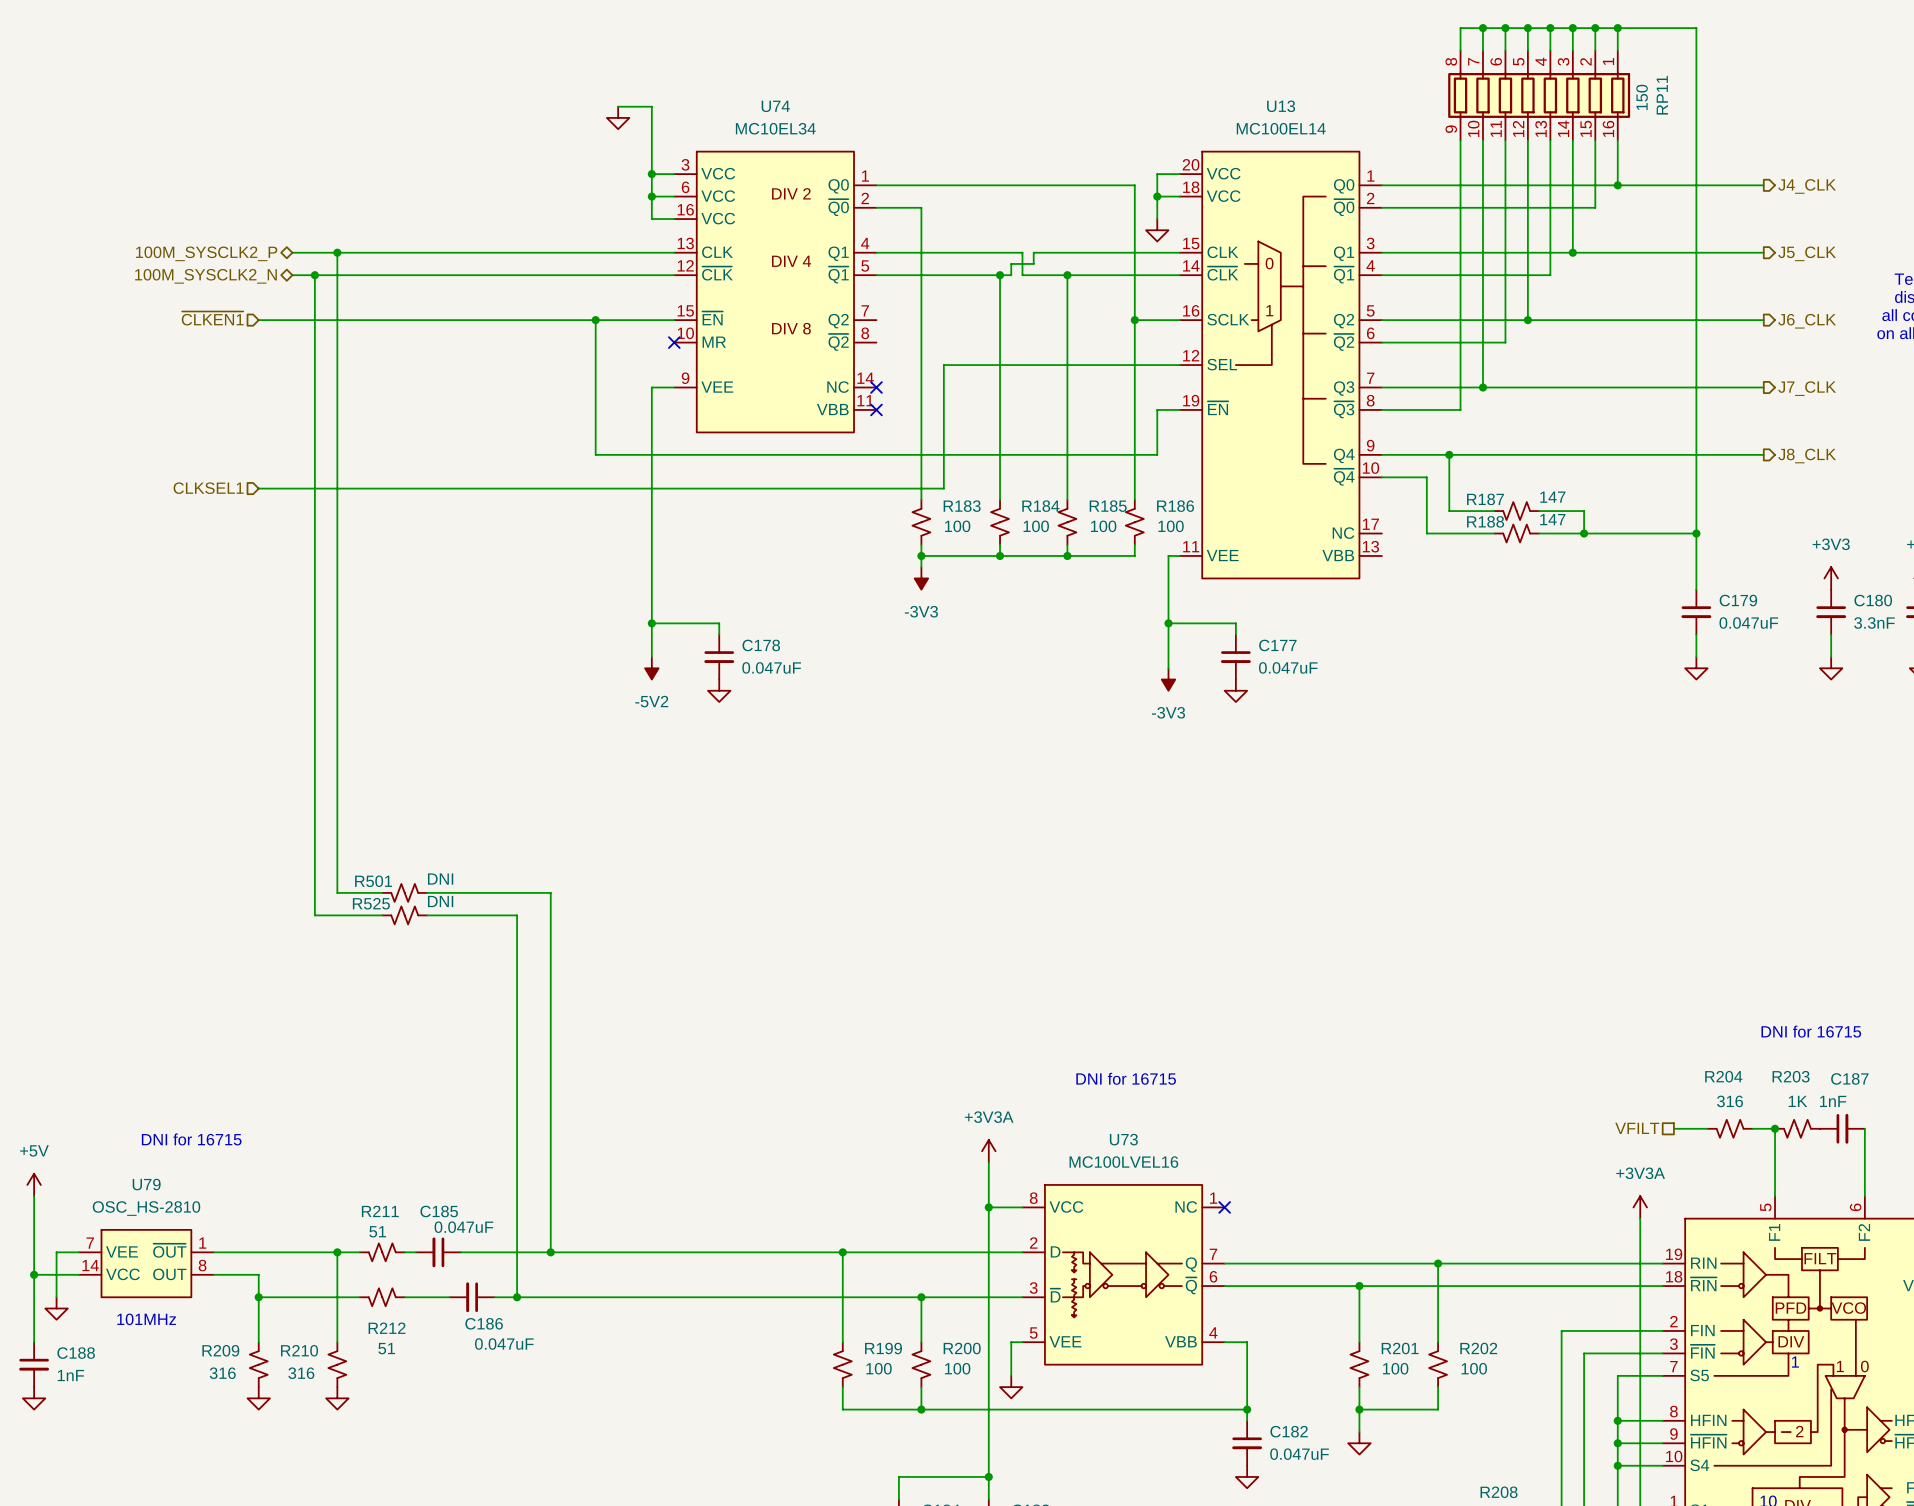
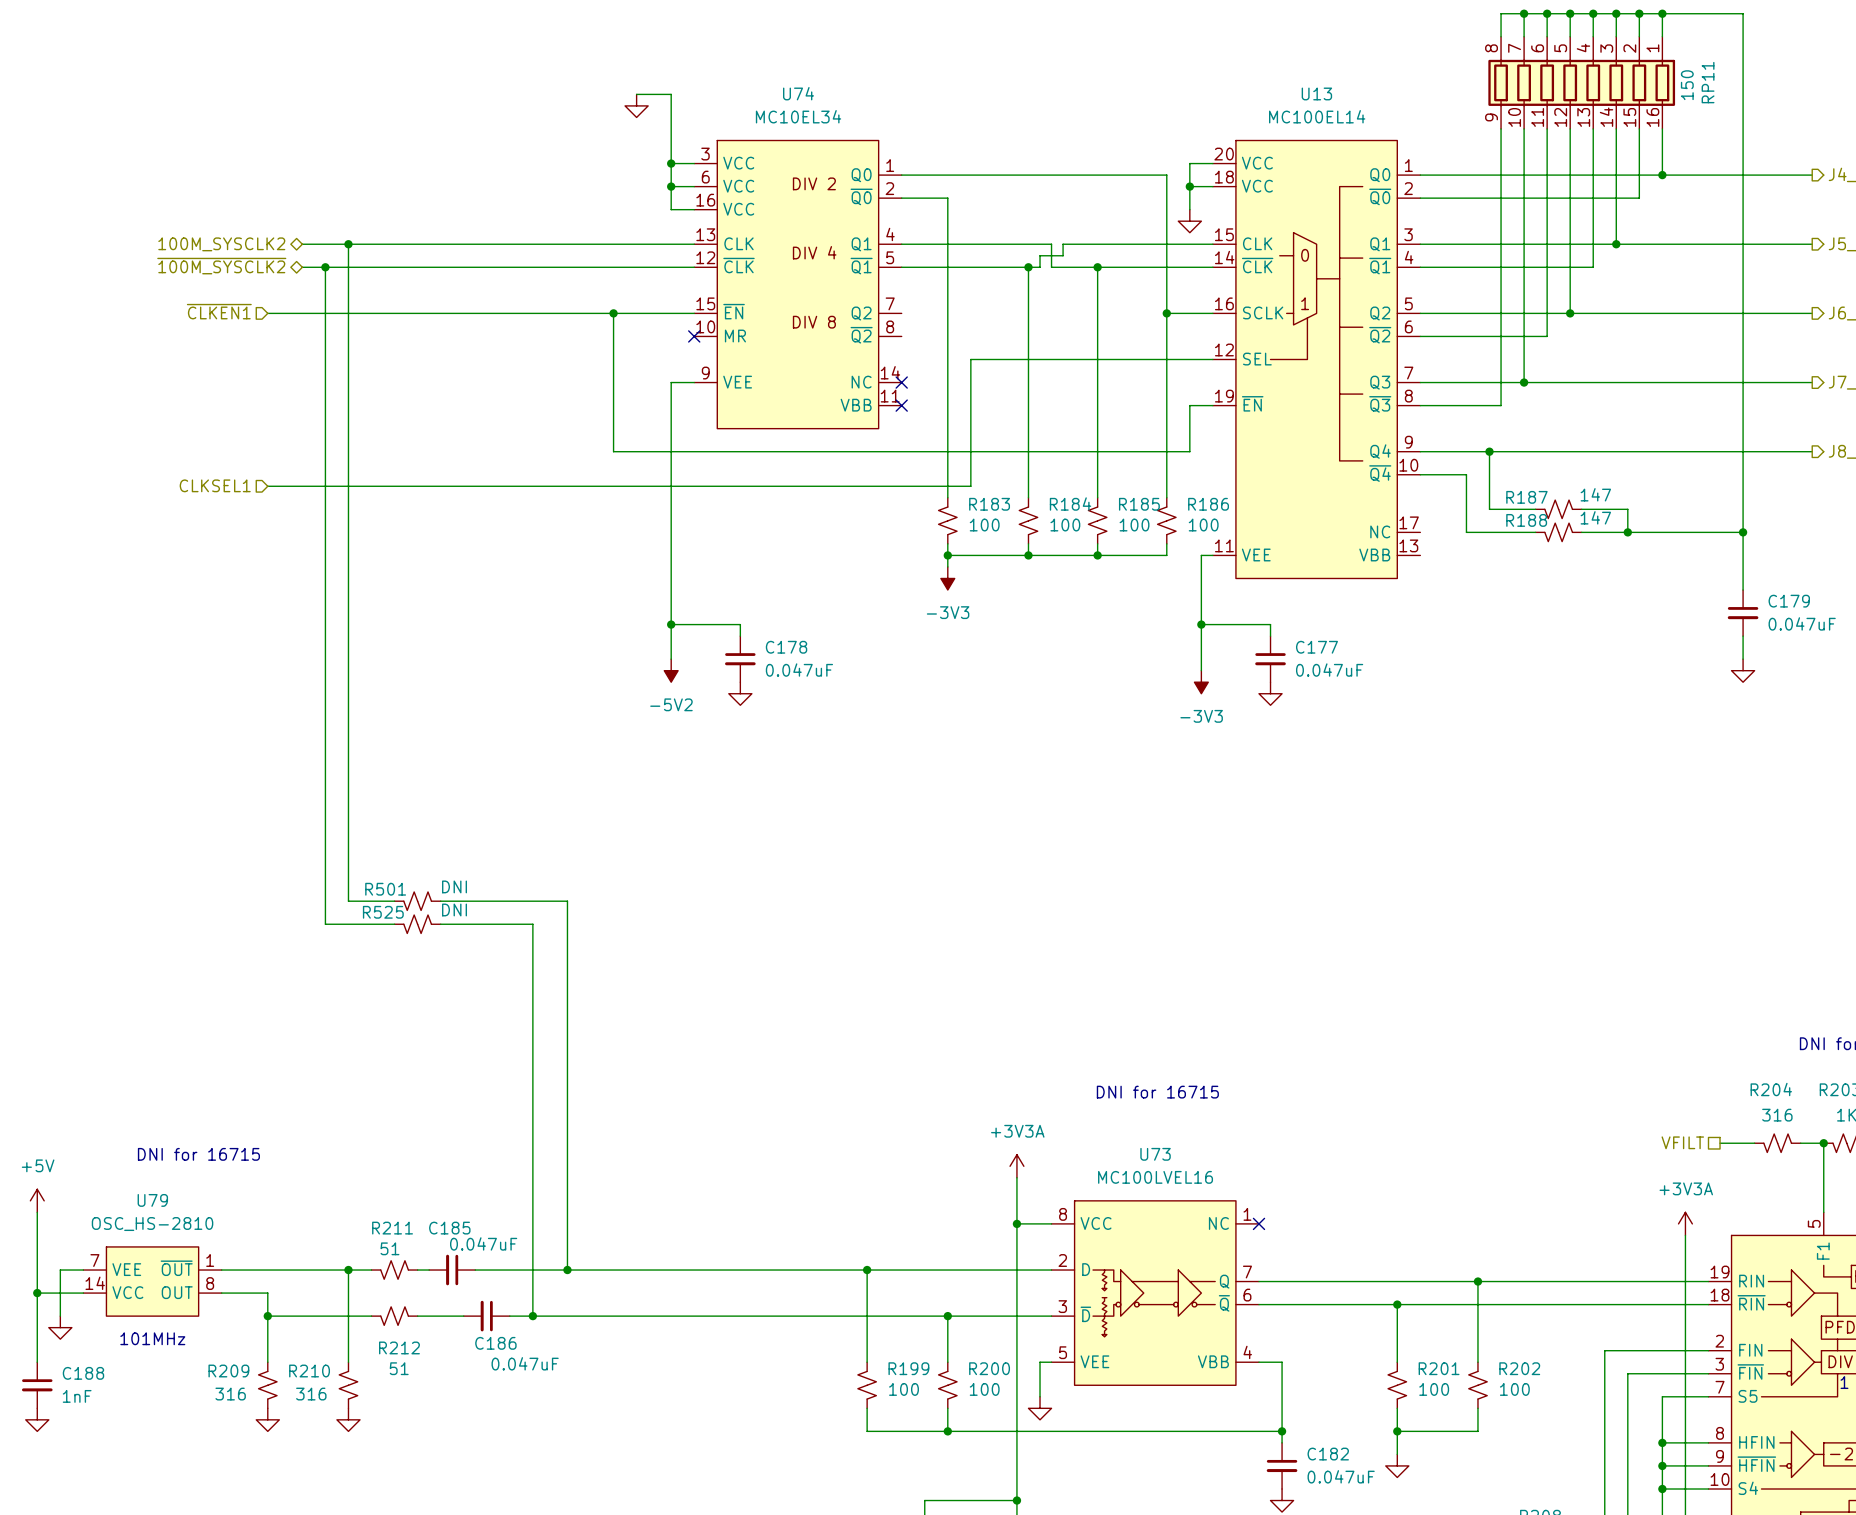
hierarchical label: 100M_SYSCLK2_P (206, 253) -> 100M_SYSCLK2 (221, 244)
hierarchical label: 100M_SYSCLK2_N (205, 276) -> ~{100M_SYSCLK2} (221, 266)

